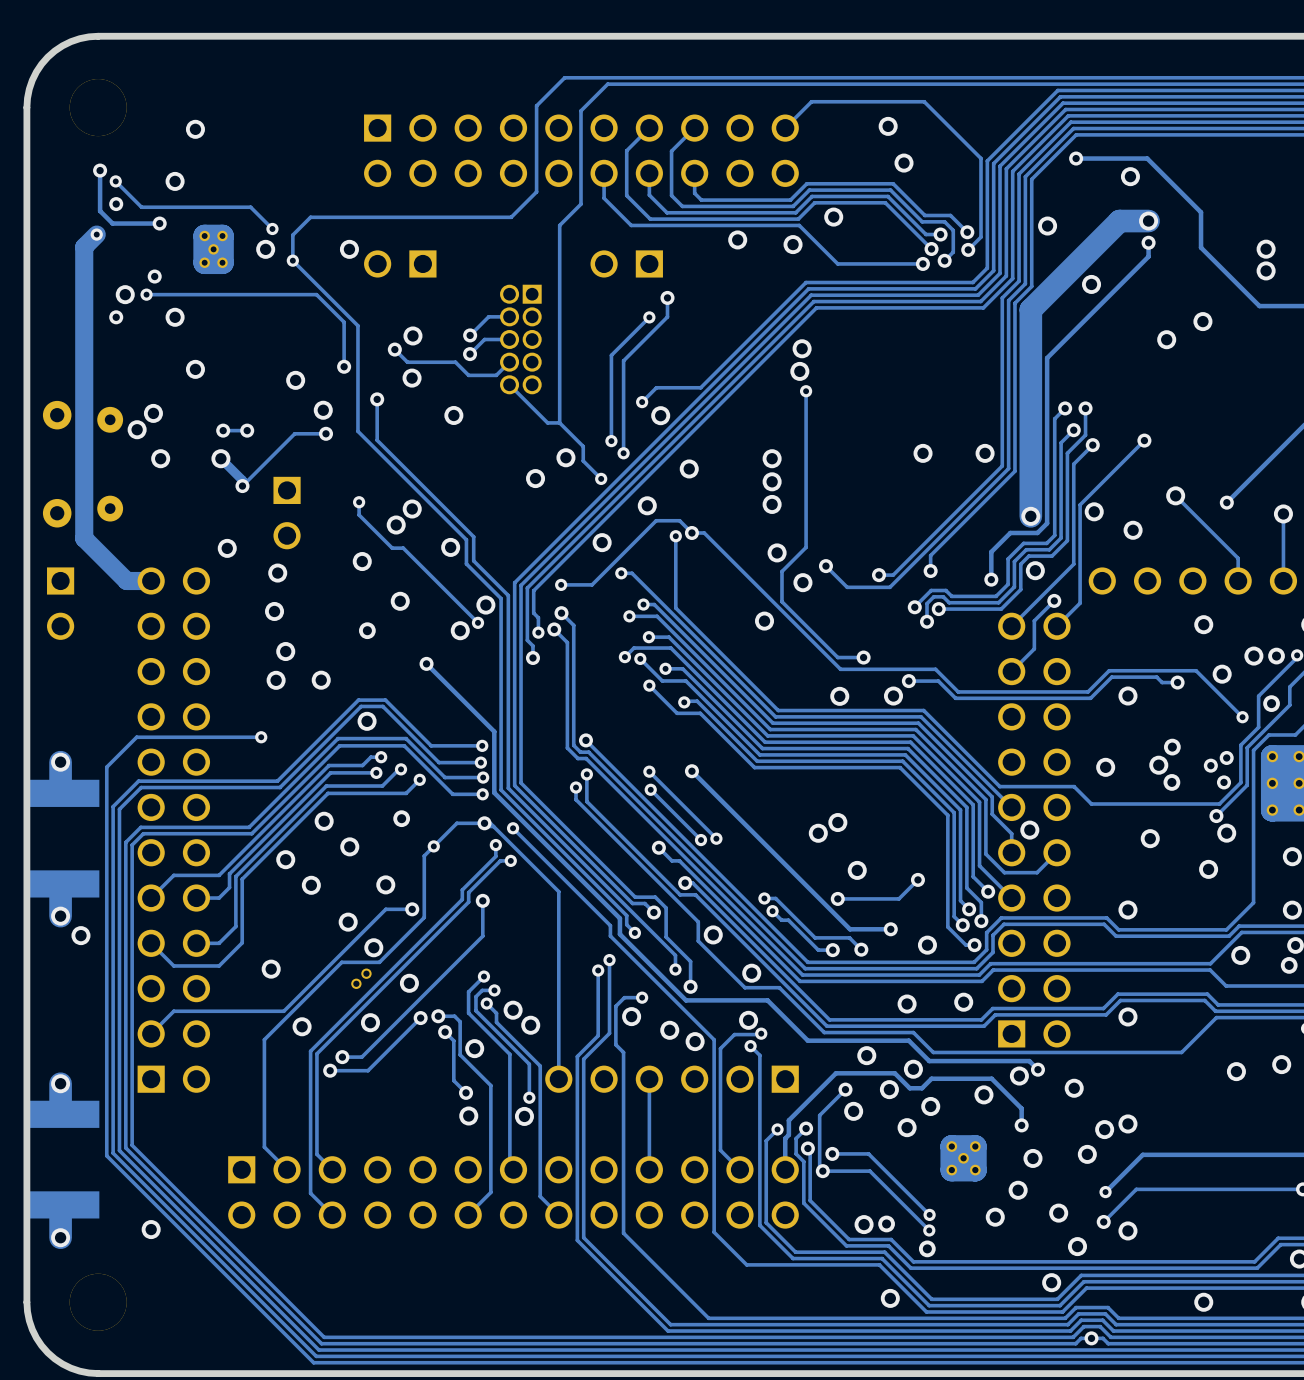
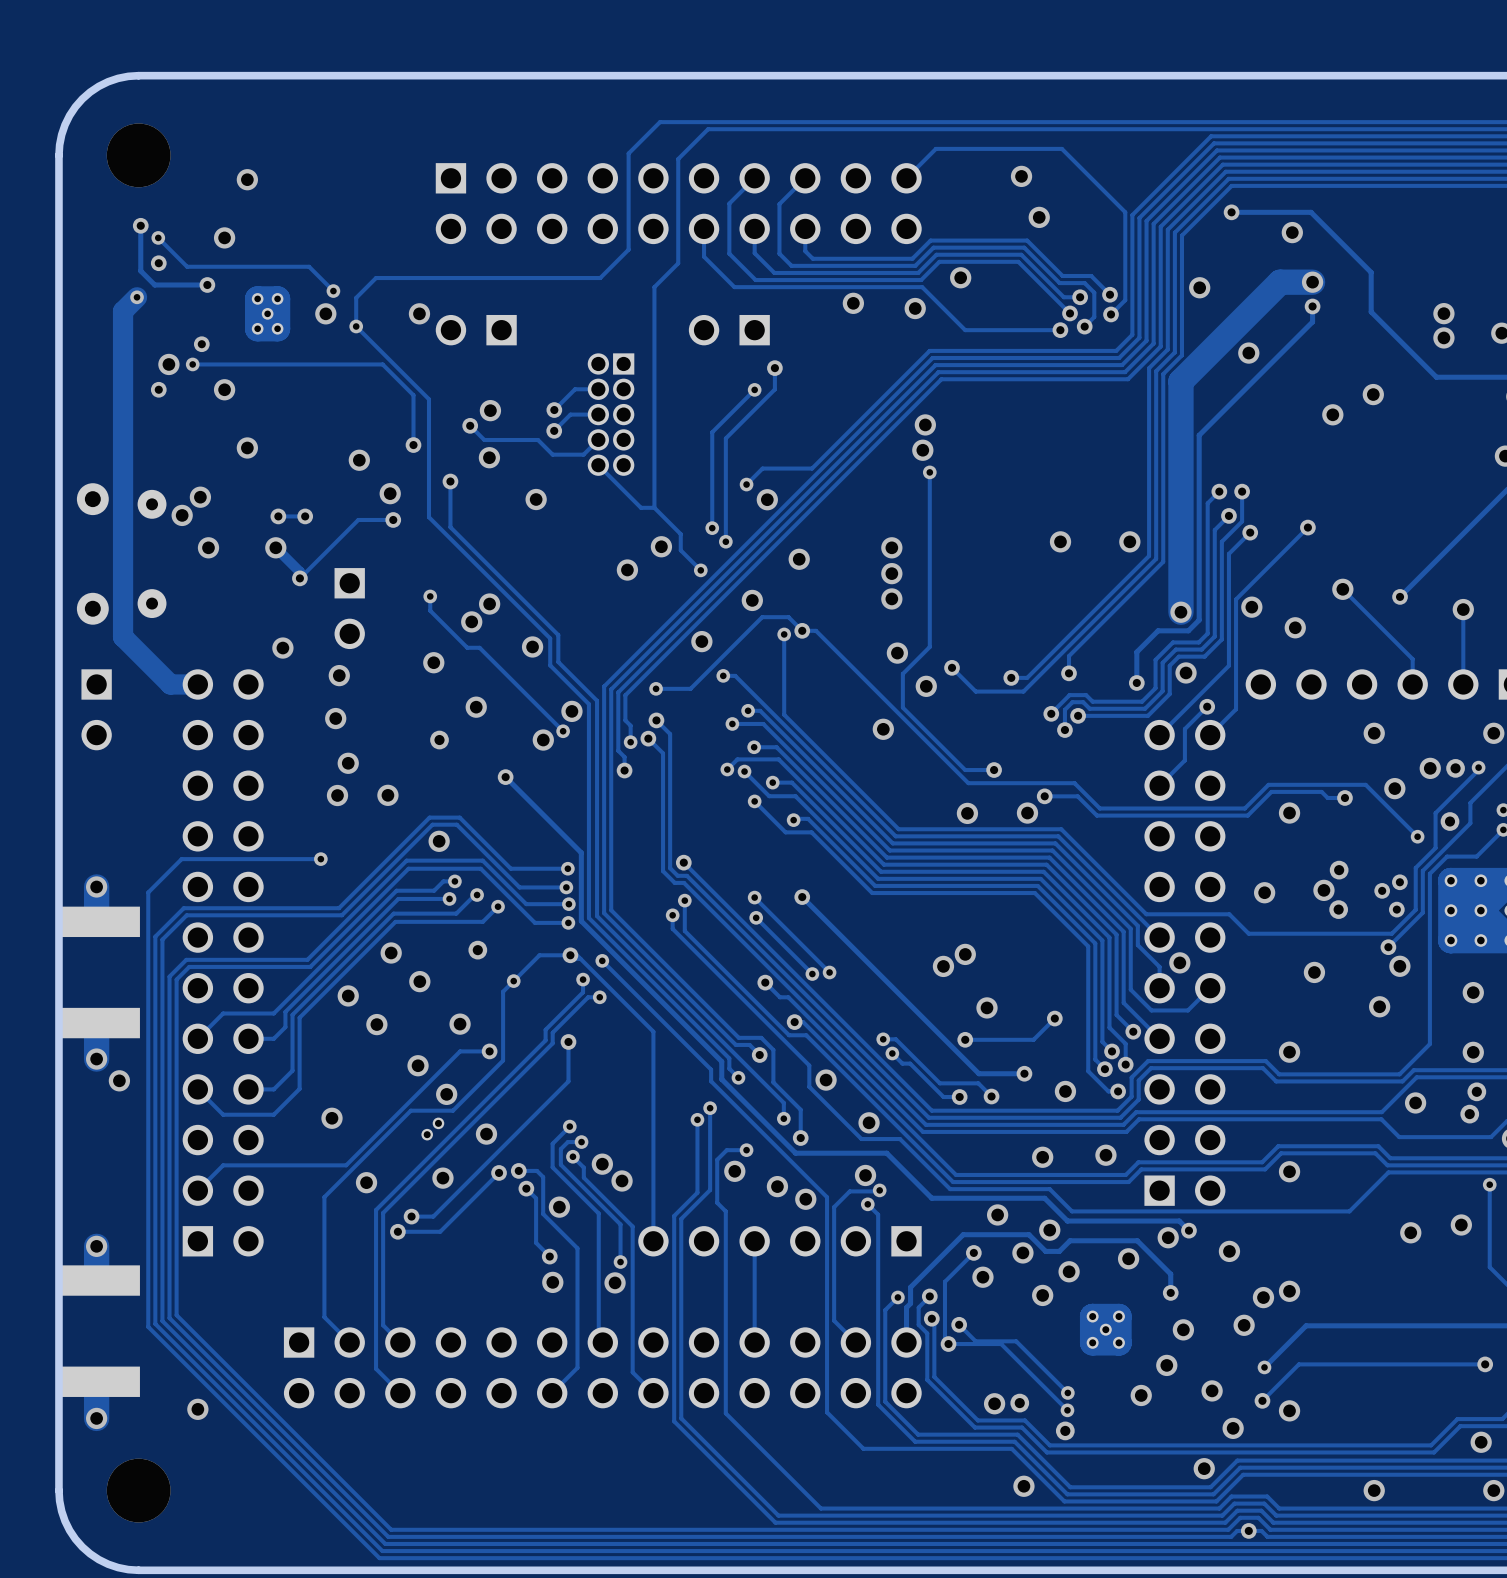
track: (832, 1153) (868, 1153) (883, 1168) -> (959, 1324) (975, 1341) (1016, 1341)

